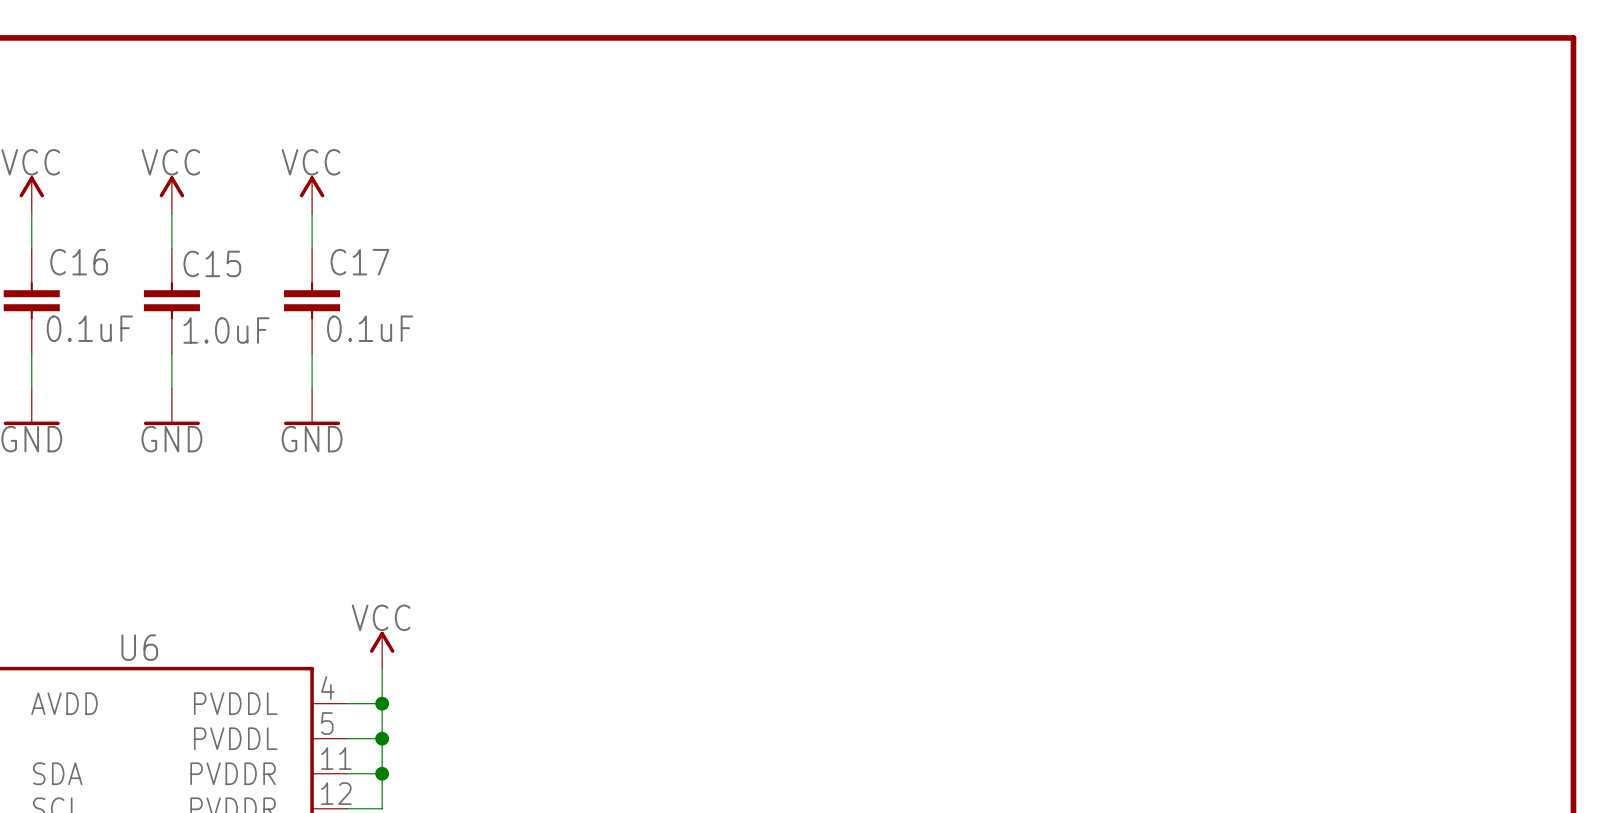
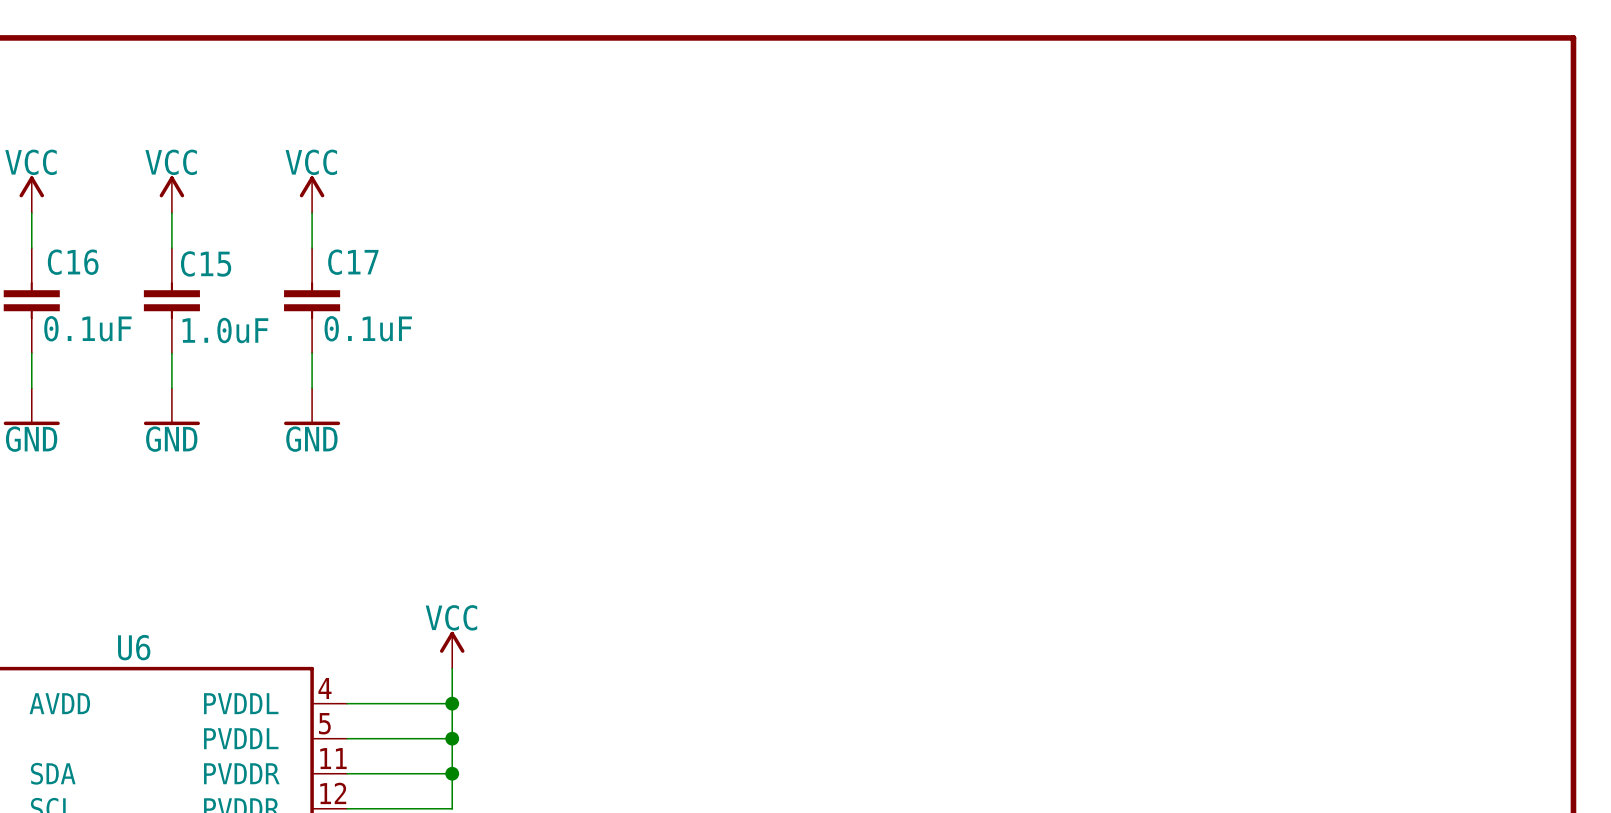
power symbol position: VCC (382, 650) -> VCC (452, 650)
wire: (382, 668) (382, 808) -> (452, 668) (452, 808) (382, 808)
wire: none -> (382, 703) (452, 703)
junction: (382, 703) -> none
junction: none -> (452, 703)
wire: none -> (382, 738) (452, 738)
junction: (382, 738) -> none
junction: none -> (452, 738)
wire: none -> (382, 773) (452, 773)
junction: (382, 773) -> none
junction: none -> (452, 773)

